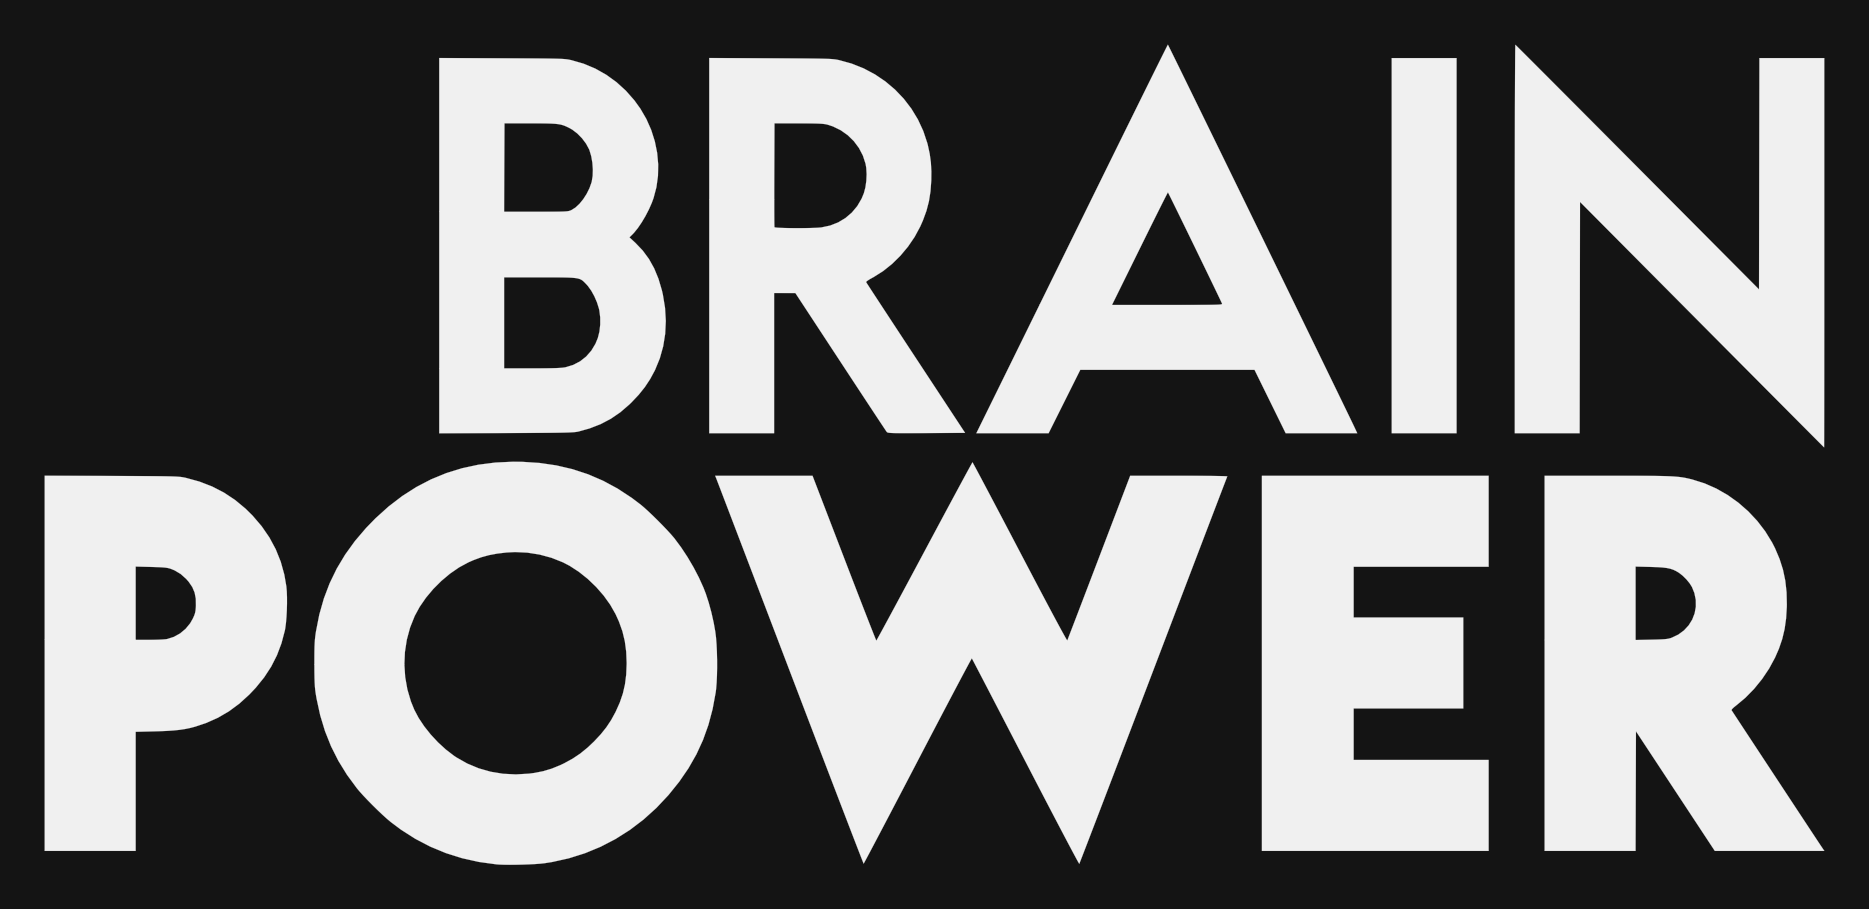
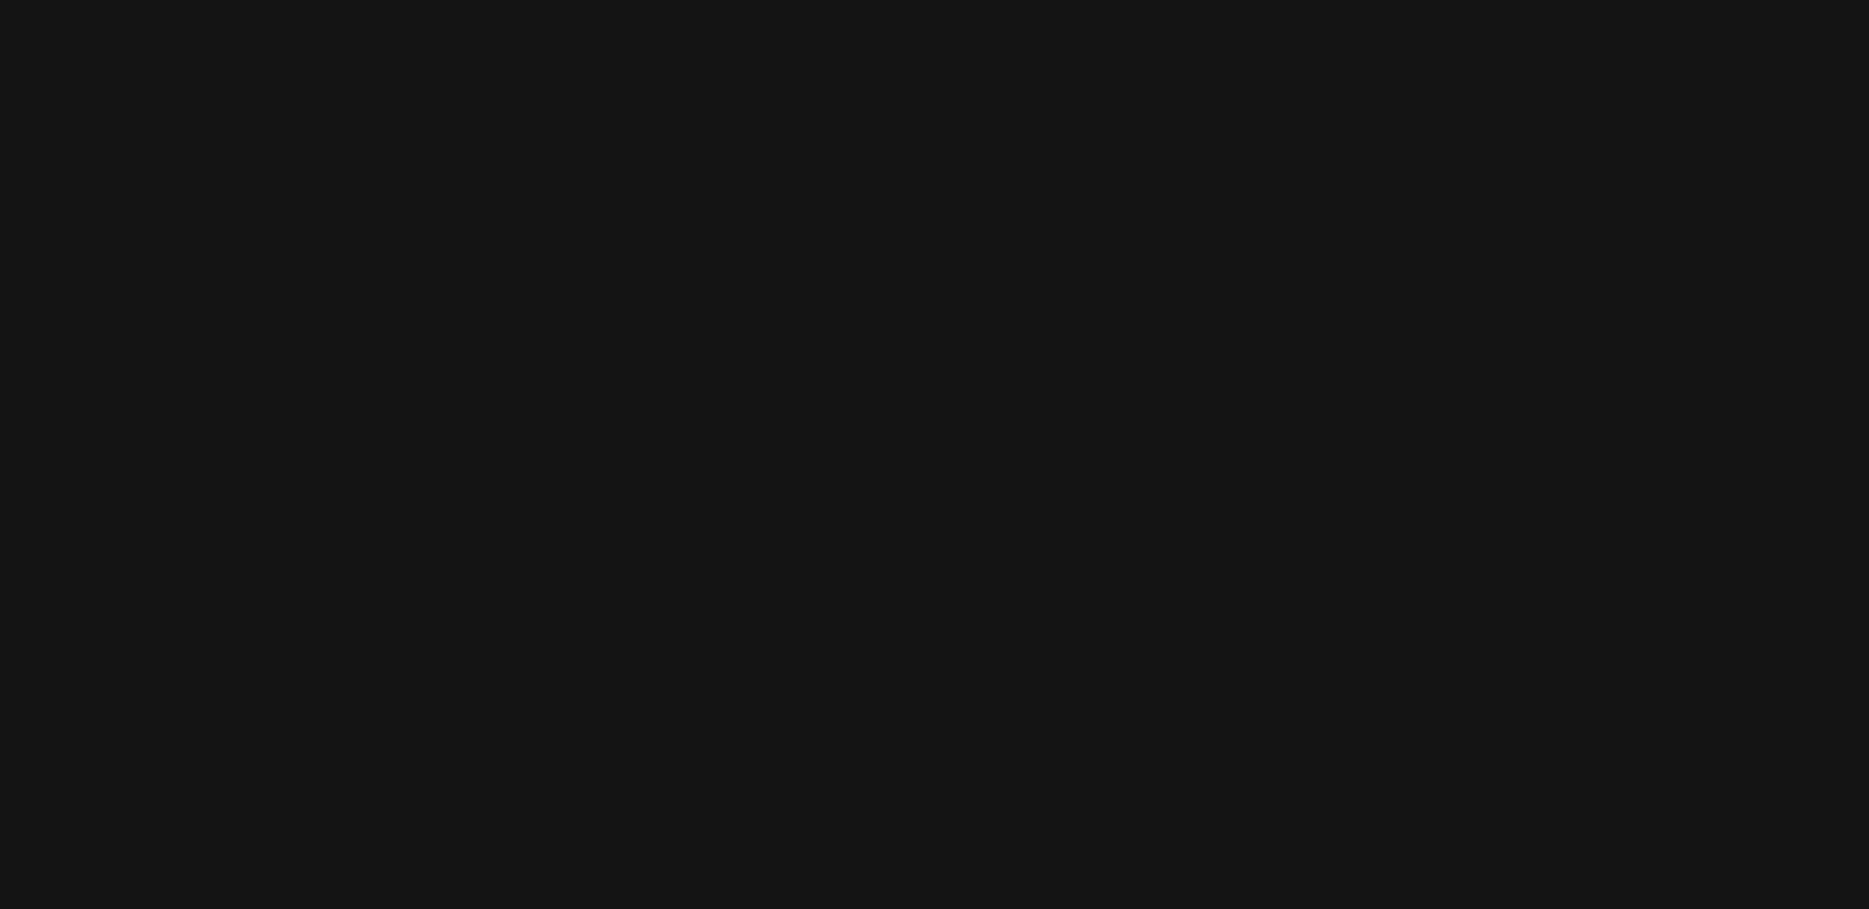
drawing: [44, 44, 1825, 865] -> none

